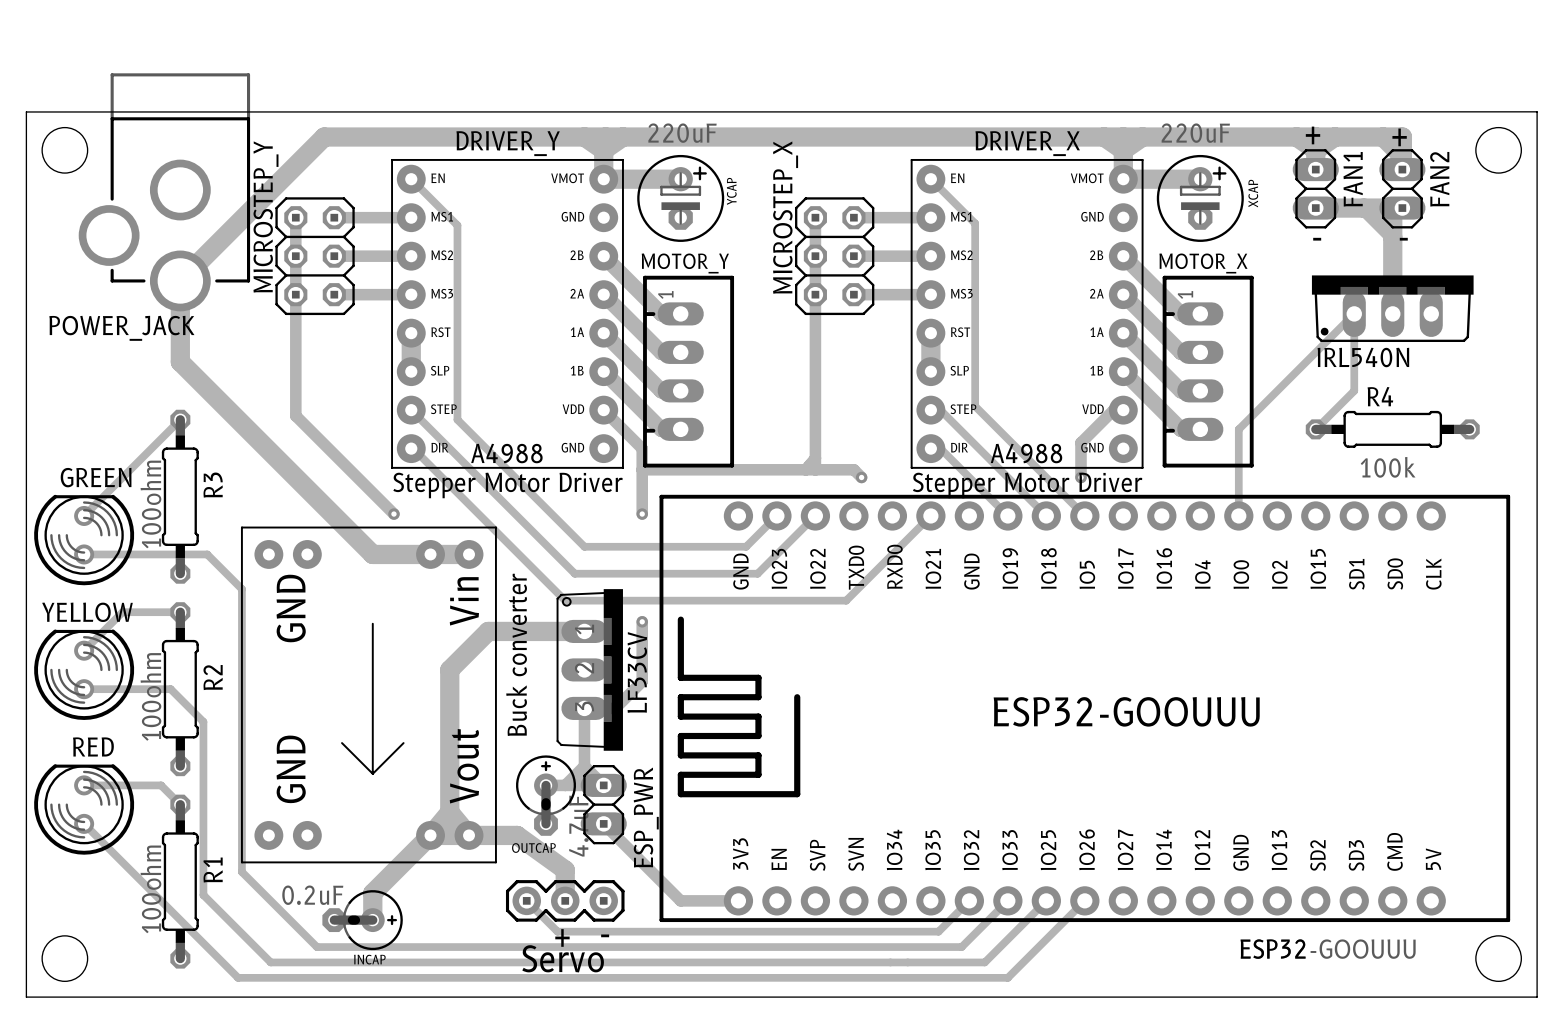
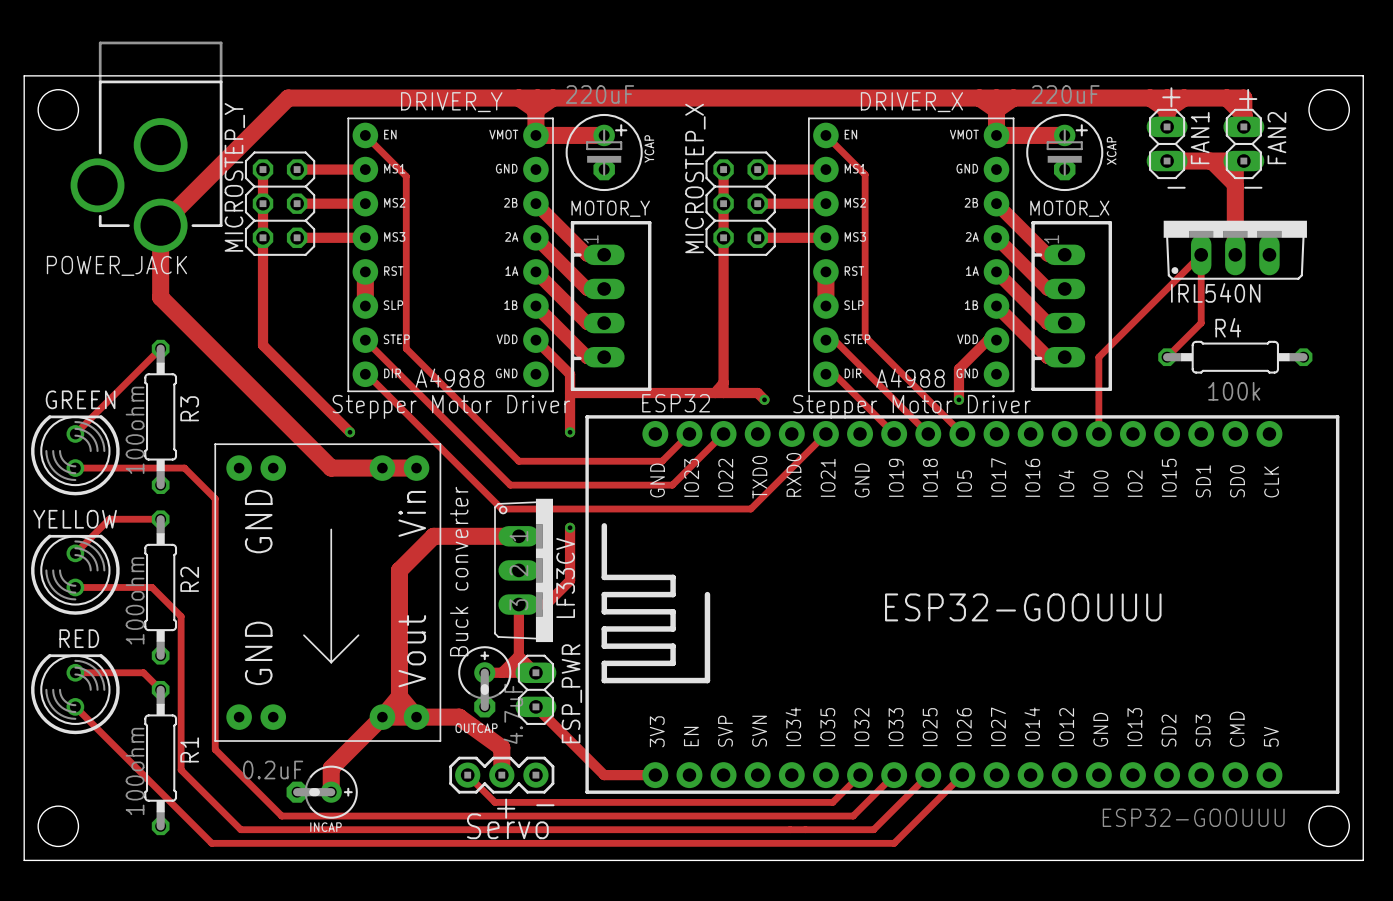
ESP32 name position: ESP32 (1273, 949) -> ESP32 (676, 403)

